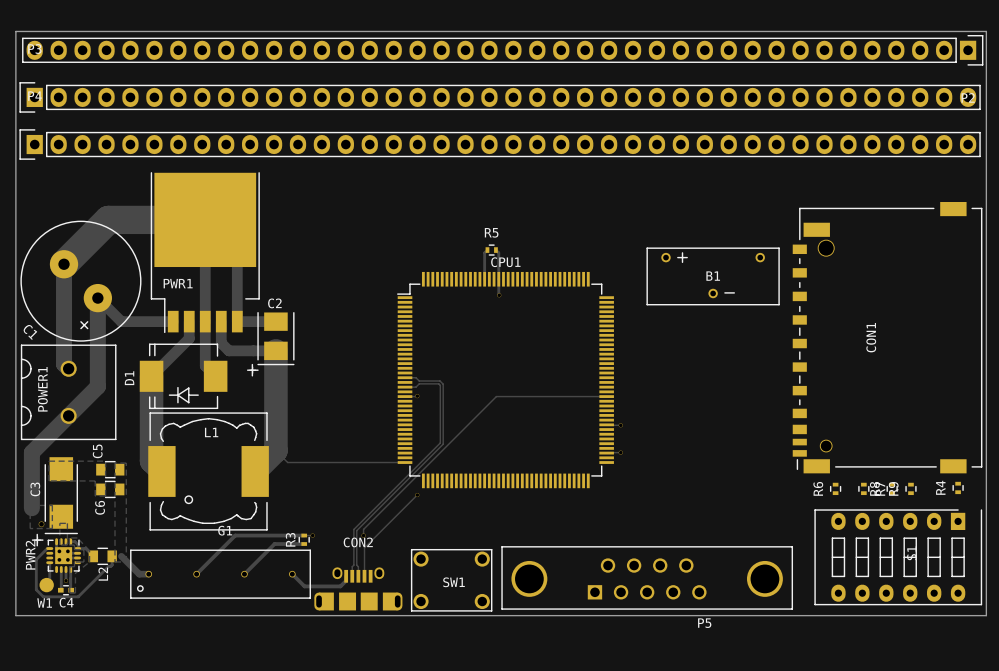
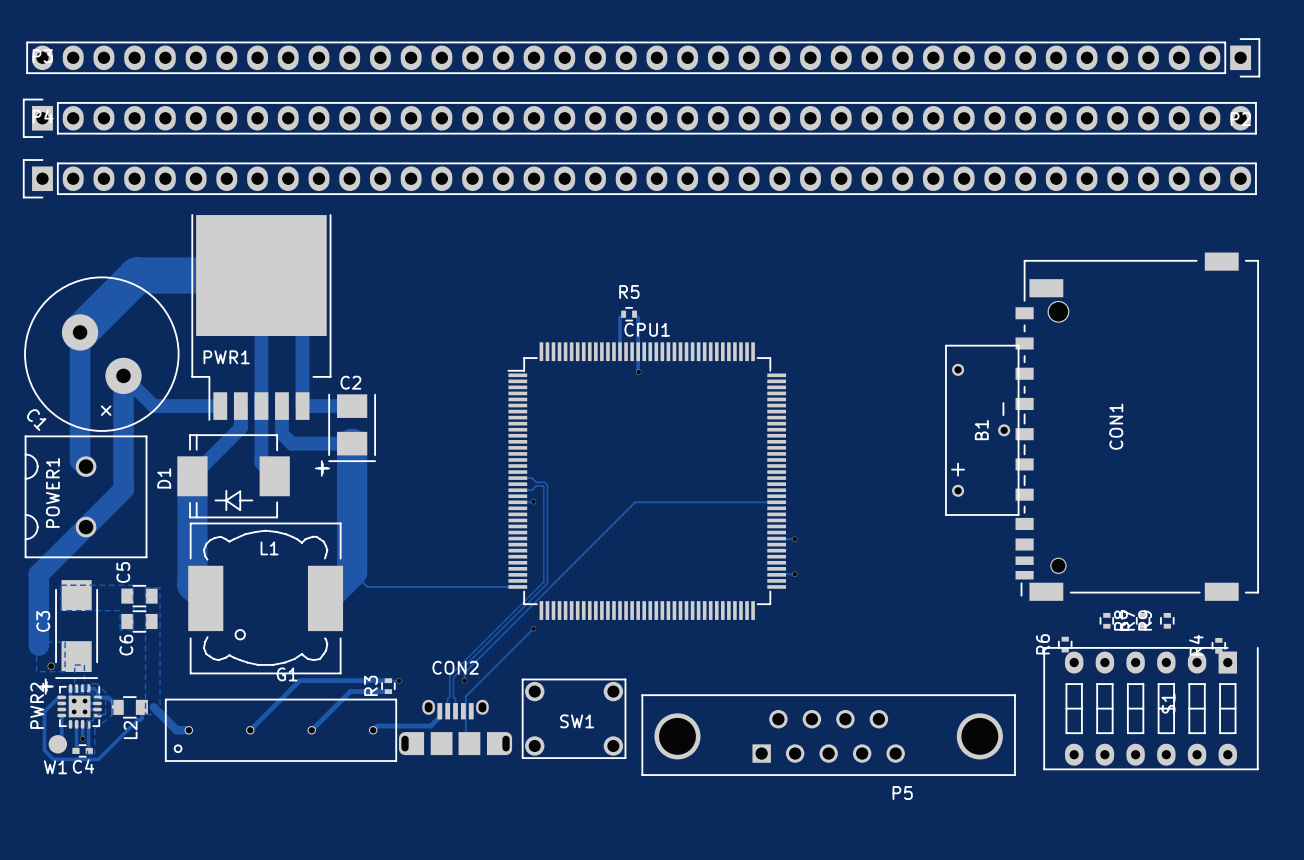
board edge: (15, 31) (15, 615) (986, 615) (986, 31) (15, 31) -> none
B1 rotation: 0° (713, 276) -> 90° counterclockwise (982, 430)
B1 position: (713, 276) -> (982, 430)
track: (425, 380) (440, 380) (443, 384) (443, 444) (356, 530) (358, 576) -> (544, 482) (547, 485) (547, 583) (453, 677) (455, 711)
track: (424, 383) (440, 385) (440, 442) (353, 529) (352, 576) -> (543, 485) (543, 581) (449, 675) (447, 711)
R4 position: (958, 487) -> (1218, 645)
R6 position: (835, 488) -> (1065, 644)
track: (292, 574) (304, 586) (340, 586) (346, 580) (346, 576) -> (373, 730) (377, 726) (430, 726) (439, 716) (439, 711)
SW1 position: (451, 580) -> (574, 718)
CON2 position: (358, 588) -> (455, 727)

